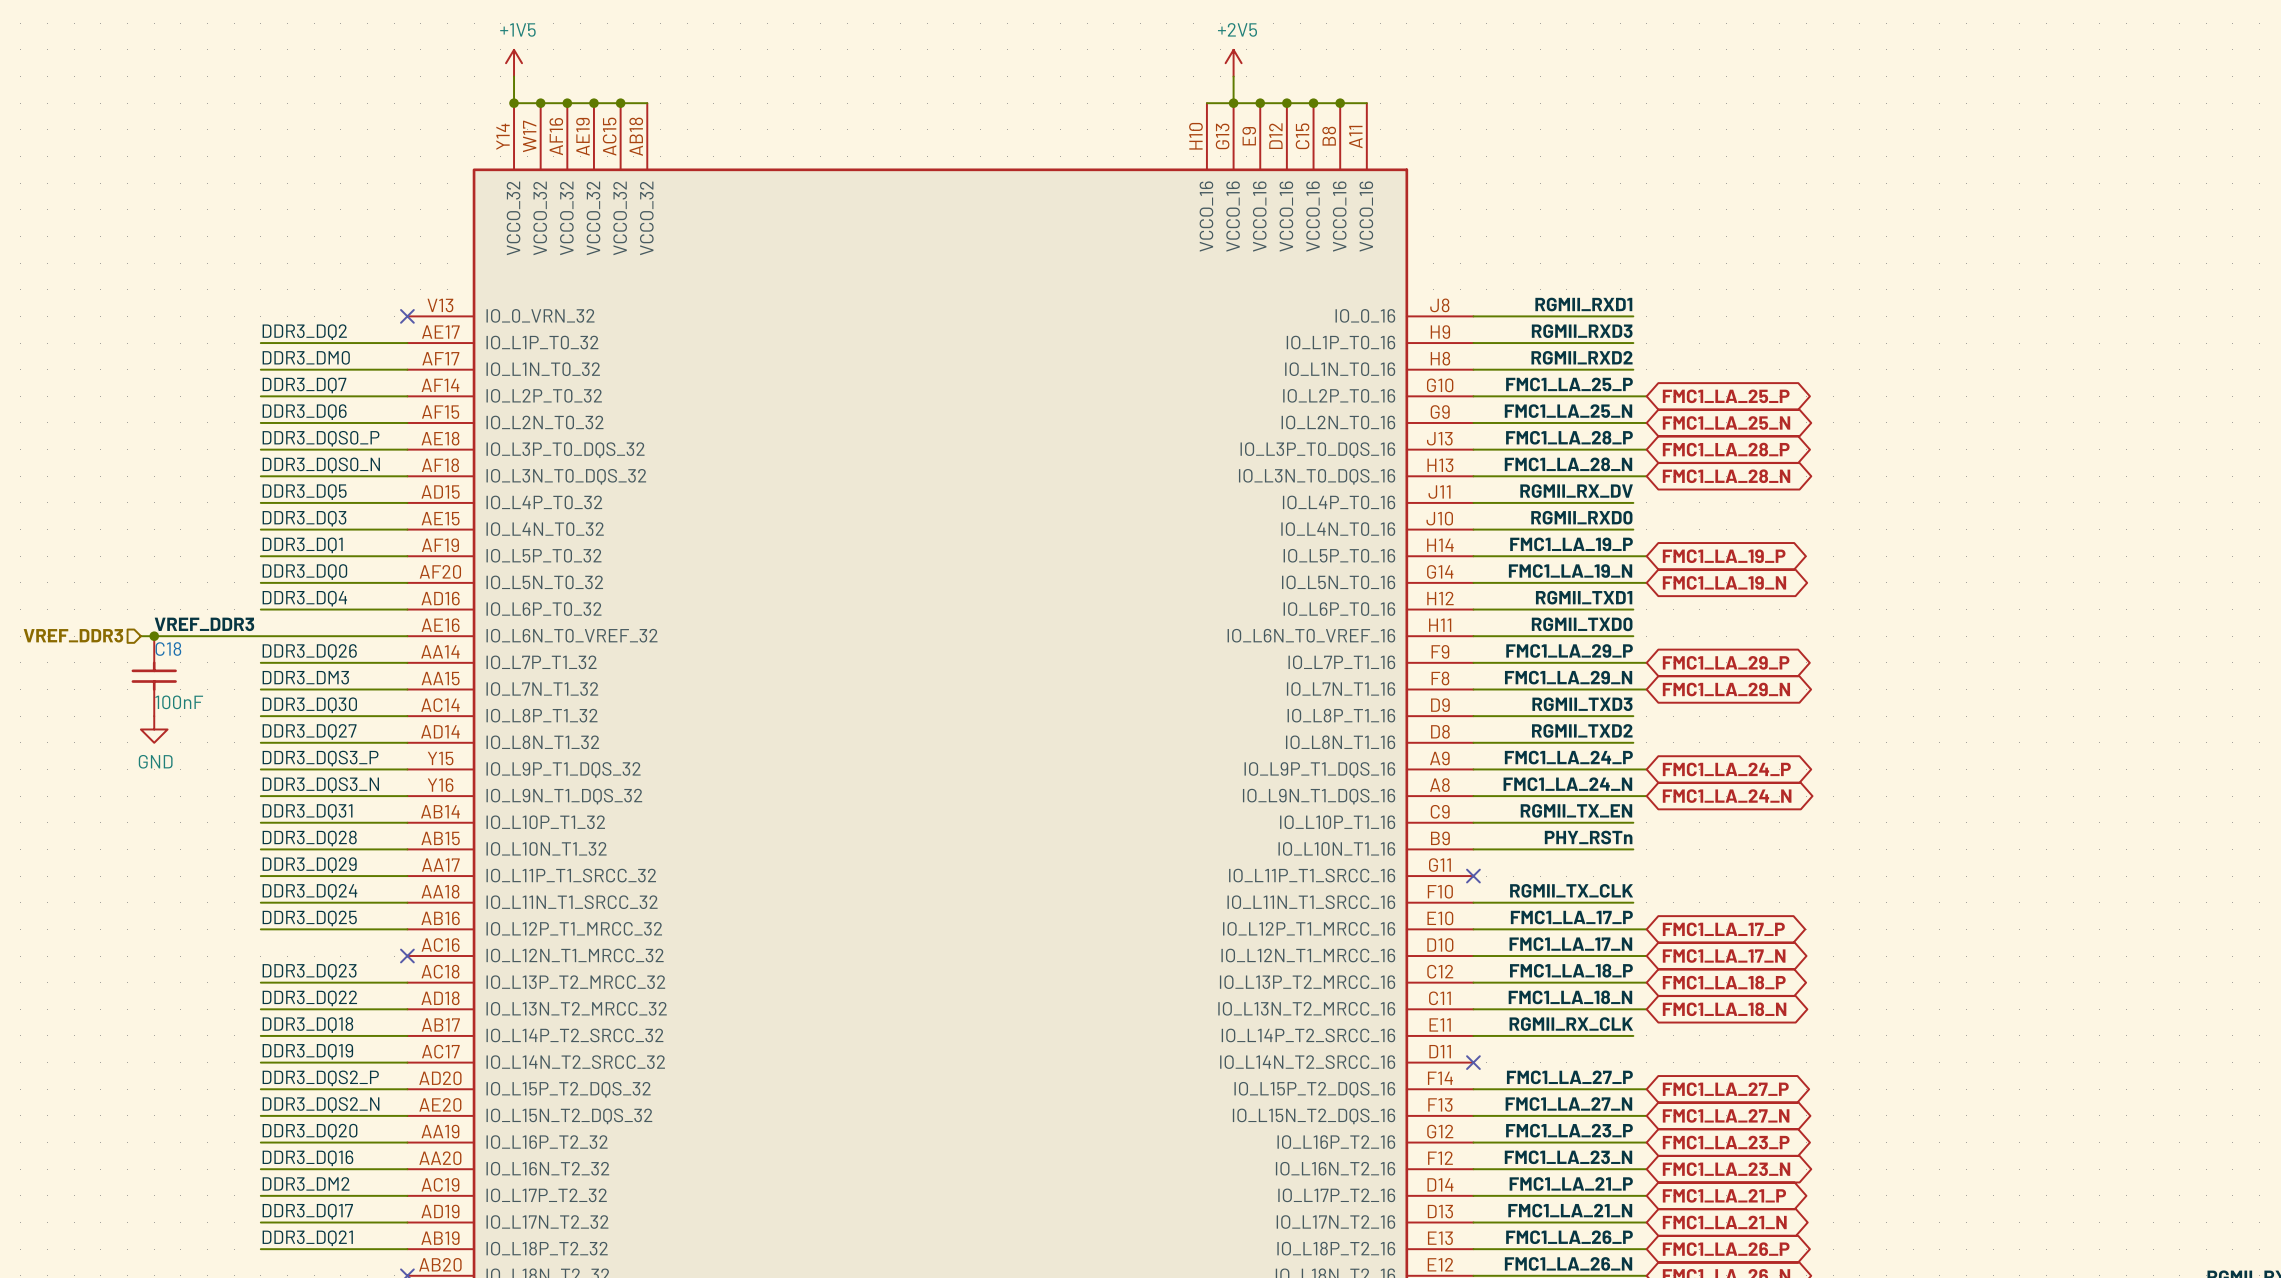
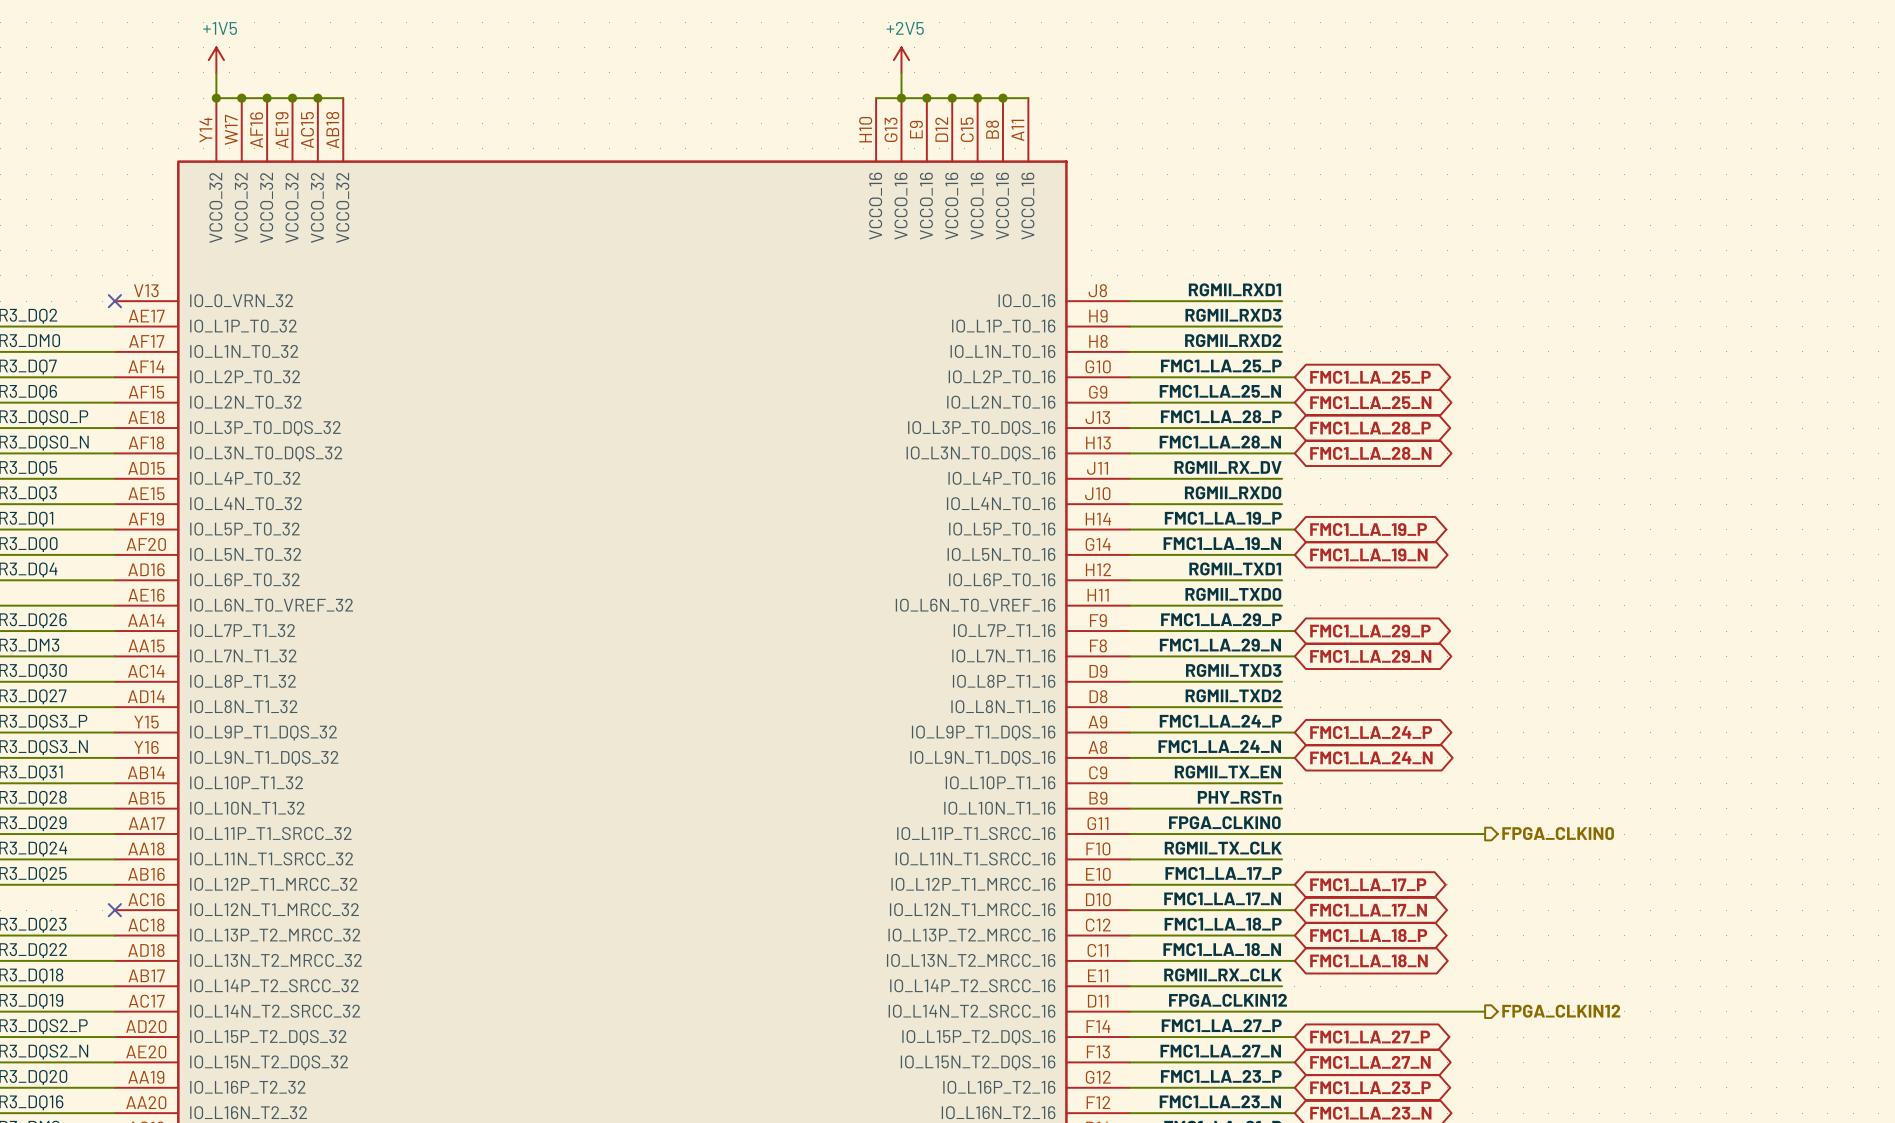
label: none -> FPGA_CLKIN0 (1224, 822)
hierarchical label: none -> FPGA_CLKIN0 (1558, 833)
wire: none -> (1129, 834) (1485, 834)
no-connect mark: (1473, 876) -> none
label: none -> FPGA_CLKIN12 (1228, 1000)
wire: none -> (1129, 1011) (1485, 1011)
no-connect mark: (1473, 1062) -> none
hierarchical label: none -> FPGA_CLKIN12 (1561, 1011)

